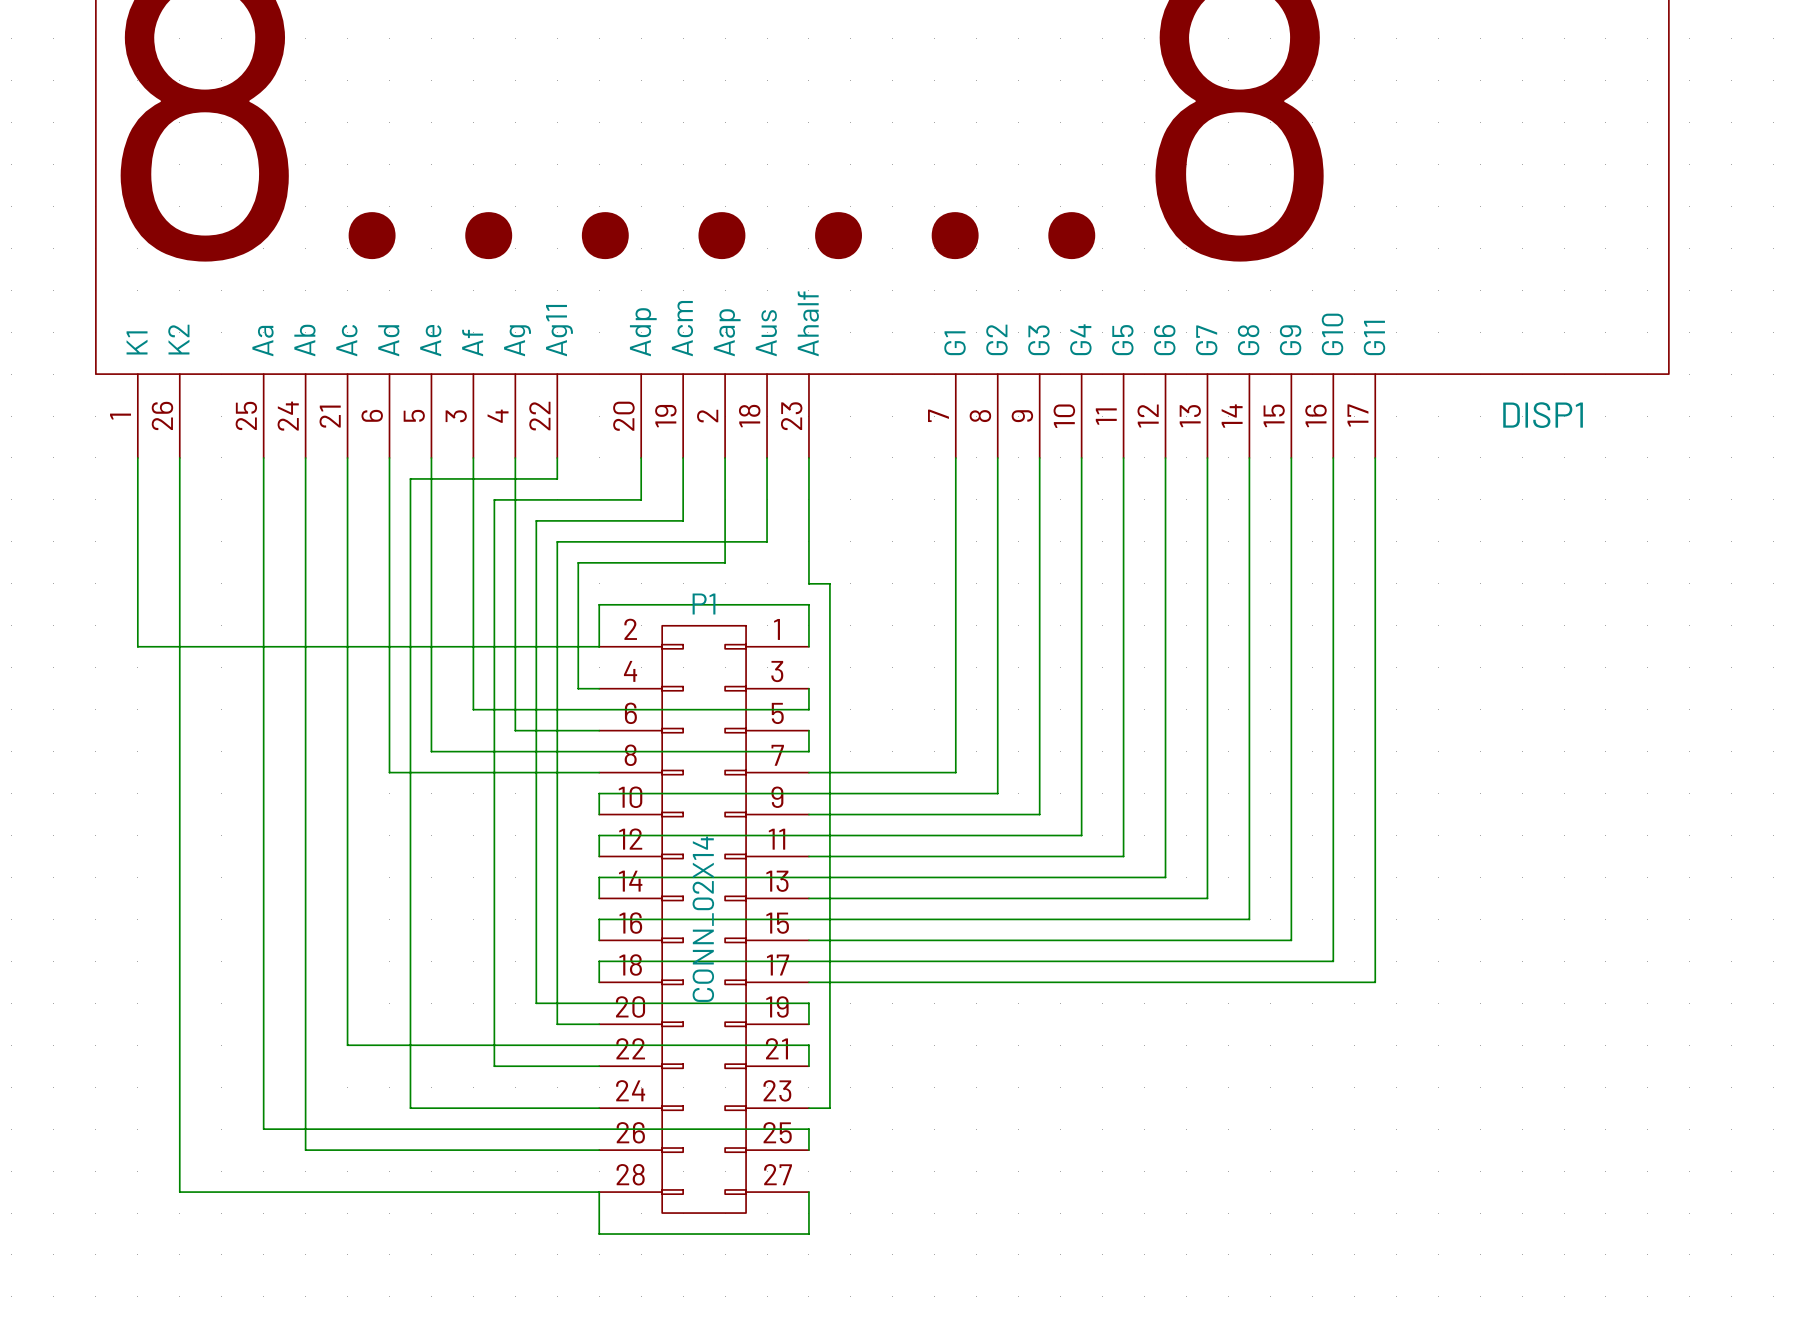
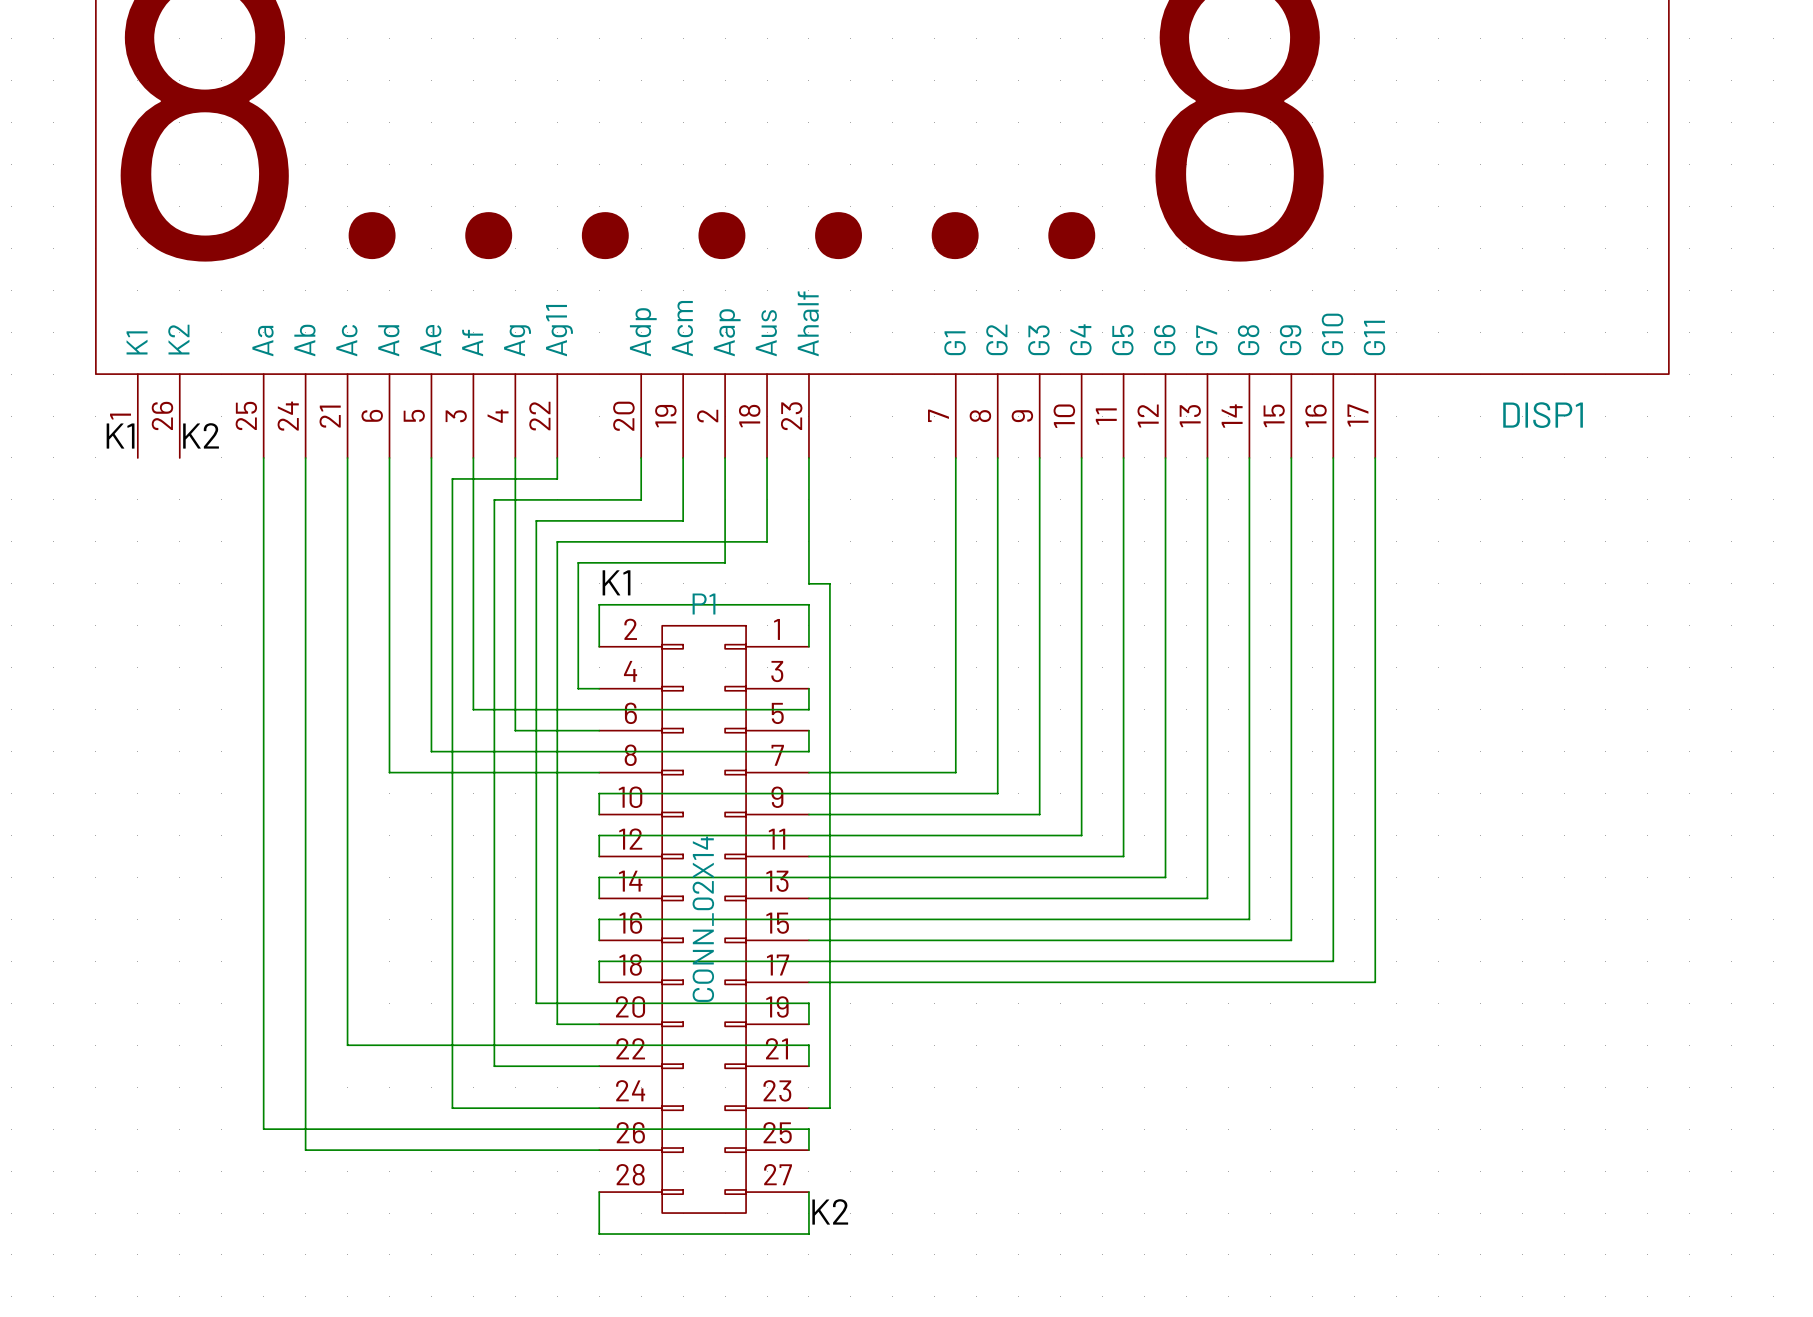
label: none -> K2 (201, 435)
label: none -> K1 (120, 436)
wire: (137, 457) (137, 646) (599, 646) -> none
wire: (179, 457) (179, 1192) (599, 1192) -> none
wire: (452, 478) (410, 478) (410, 1108) (452, 1108) -> (452, 478) (452, 1108)
label: none -> K1 (616, 582)
label: none -> K2 (830, 1211)

